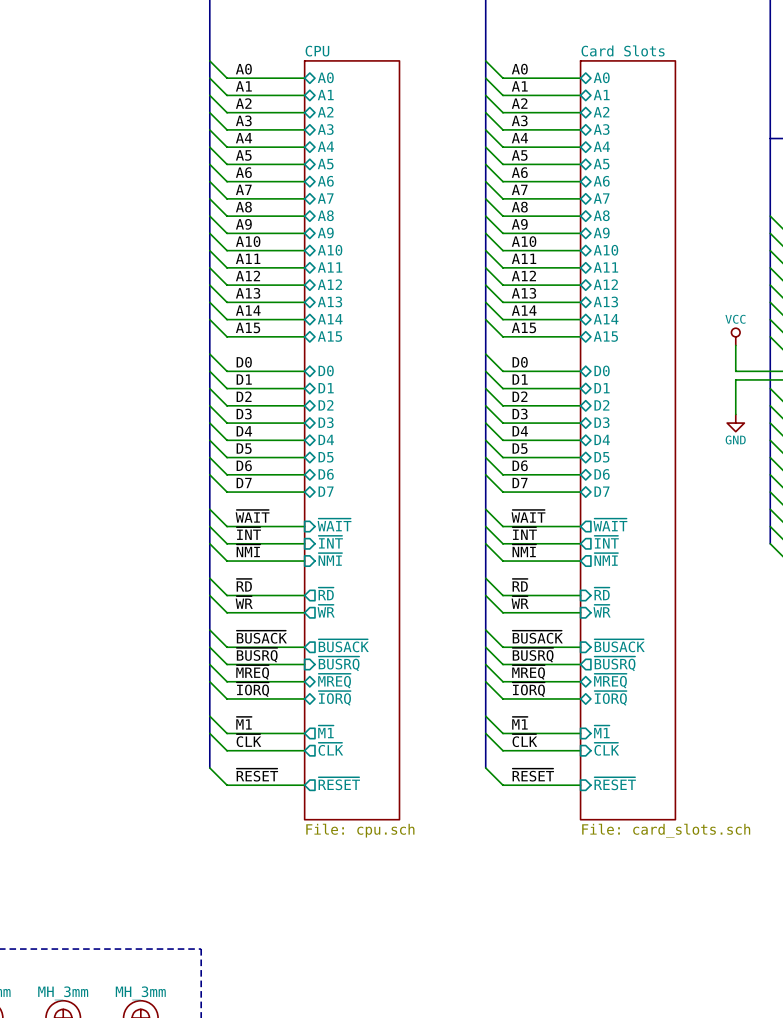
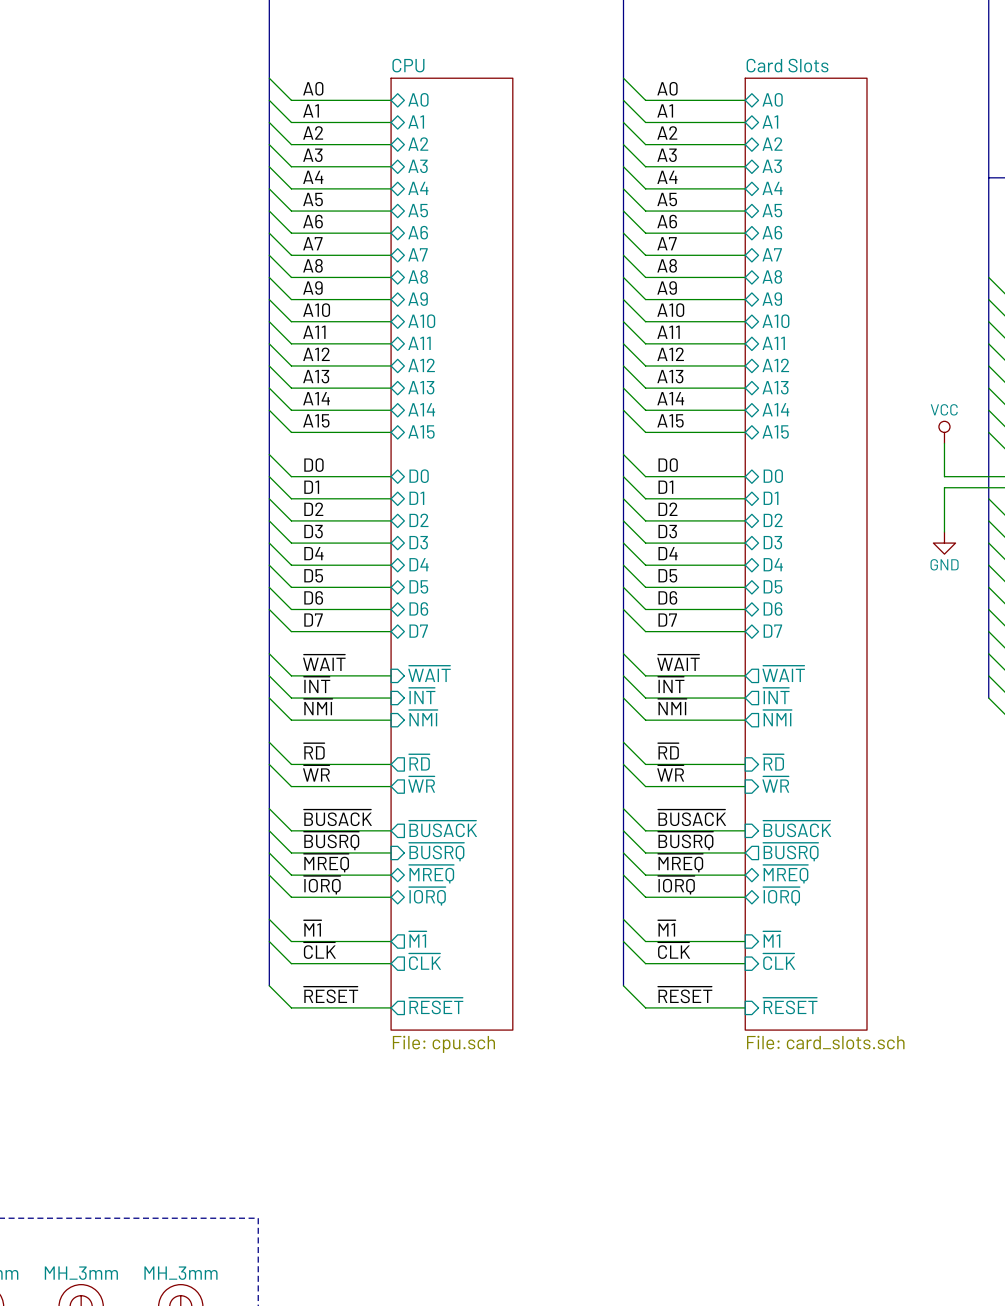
sheet CPU: none -> File: cpu.sch (451, 554)
sheet Card Slots: none -> File: card_slots.sch (806, 554)
sheet CPU: File: cpu.sch (352, 440) -> none
sheet Card Slots: File: card_slots.sch (627, 440) -> none

